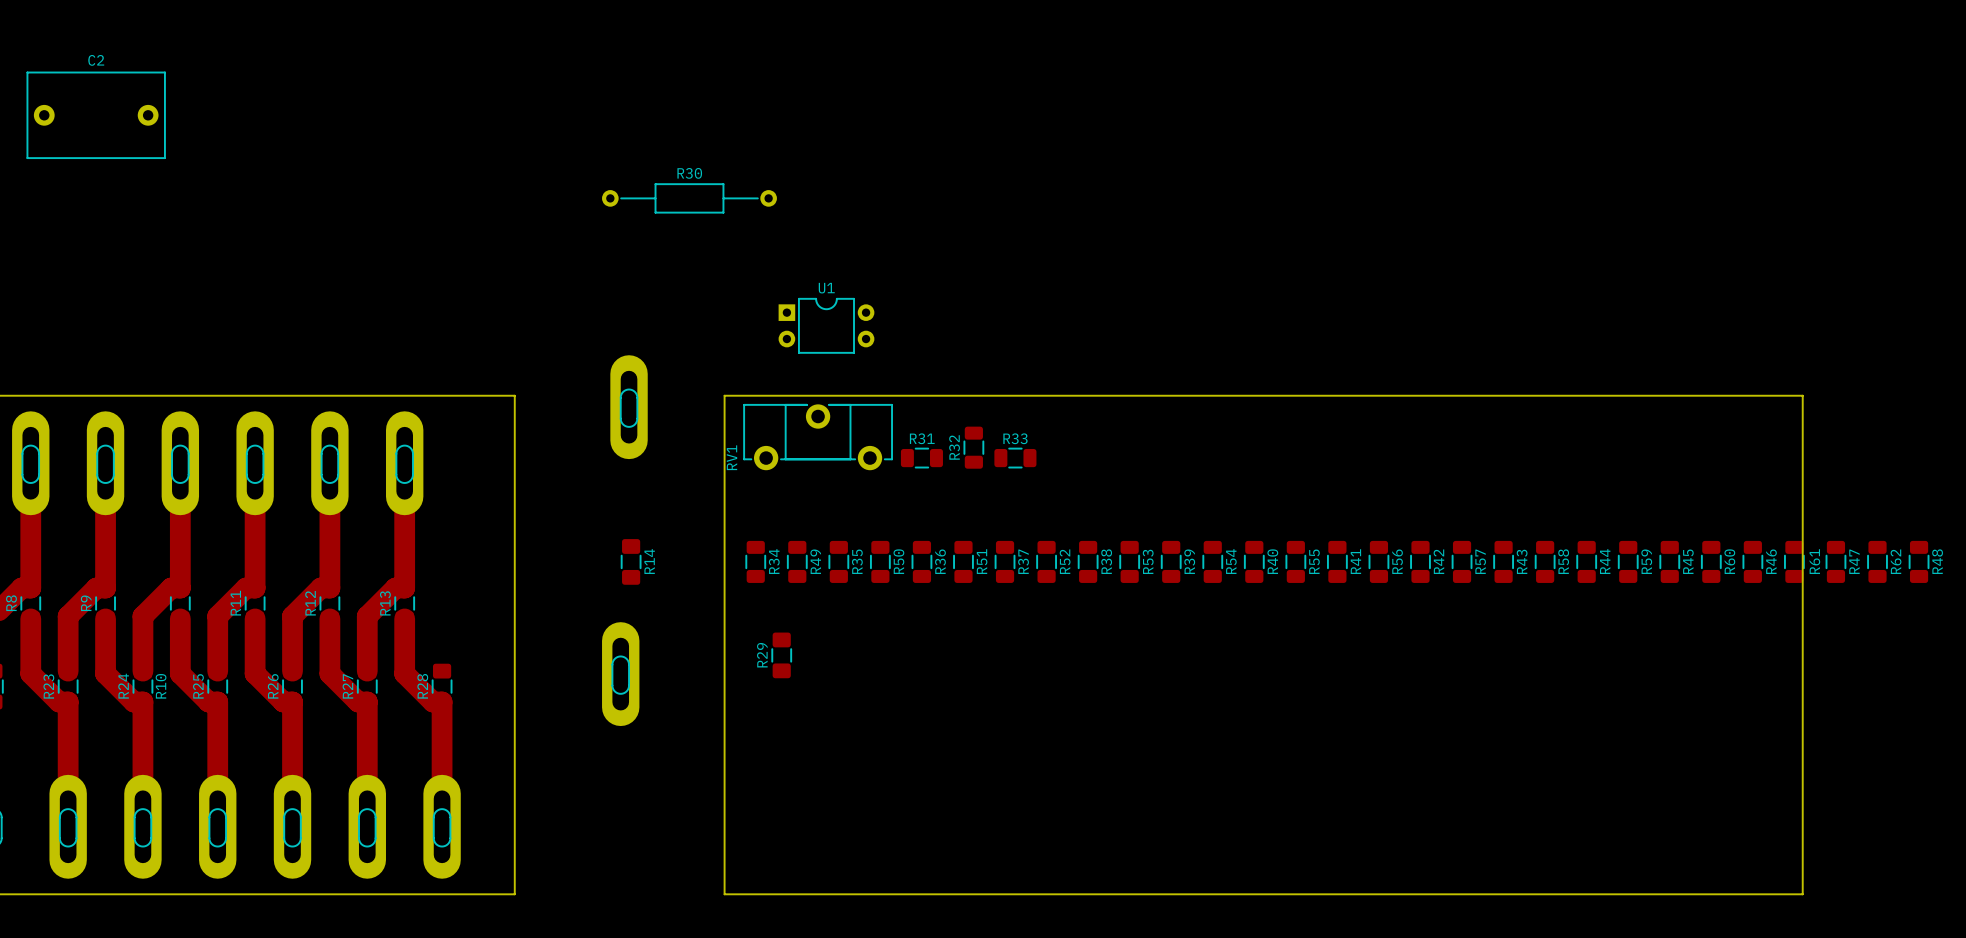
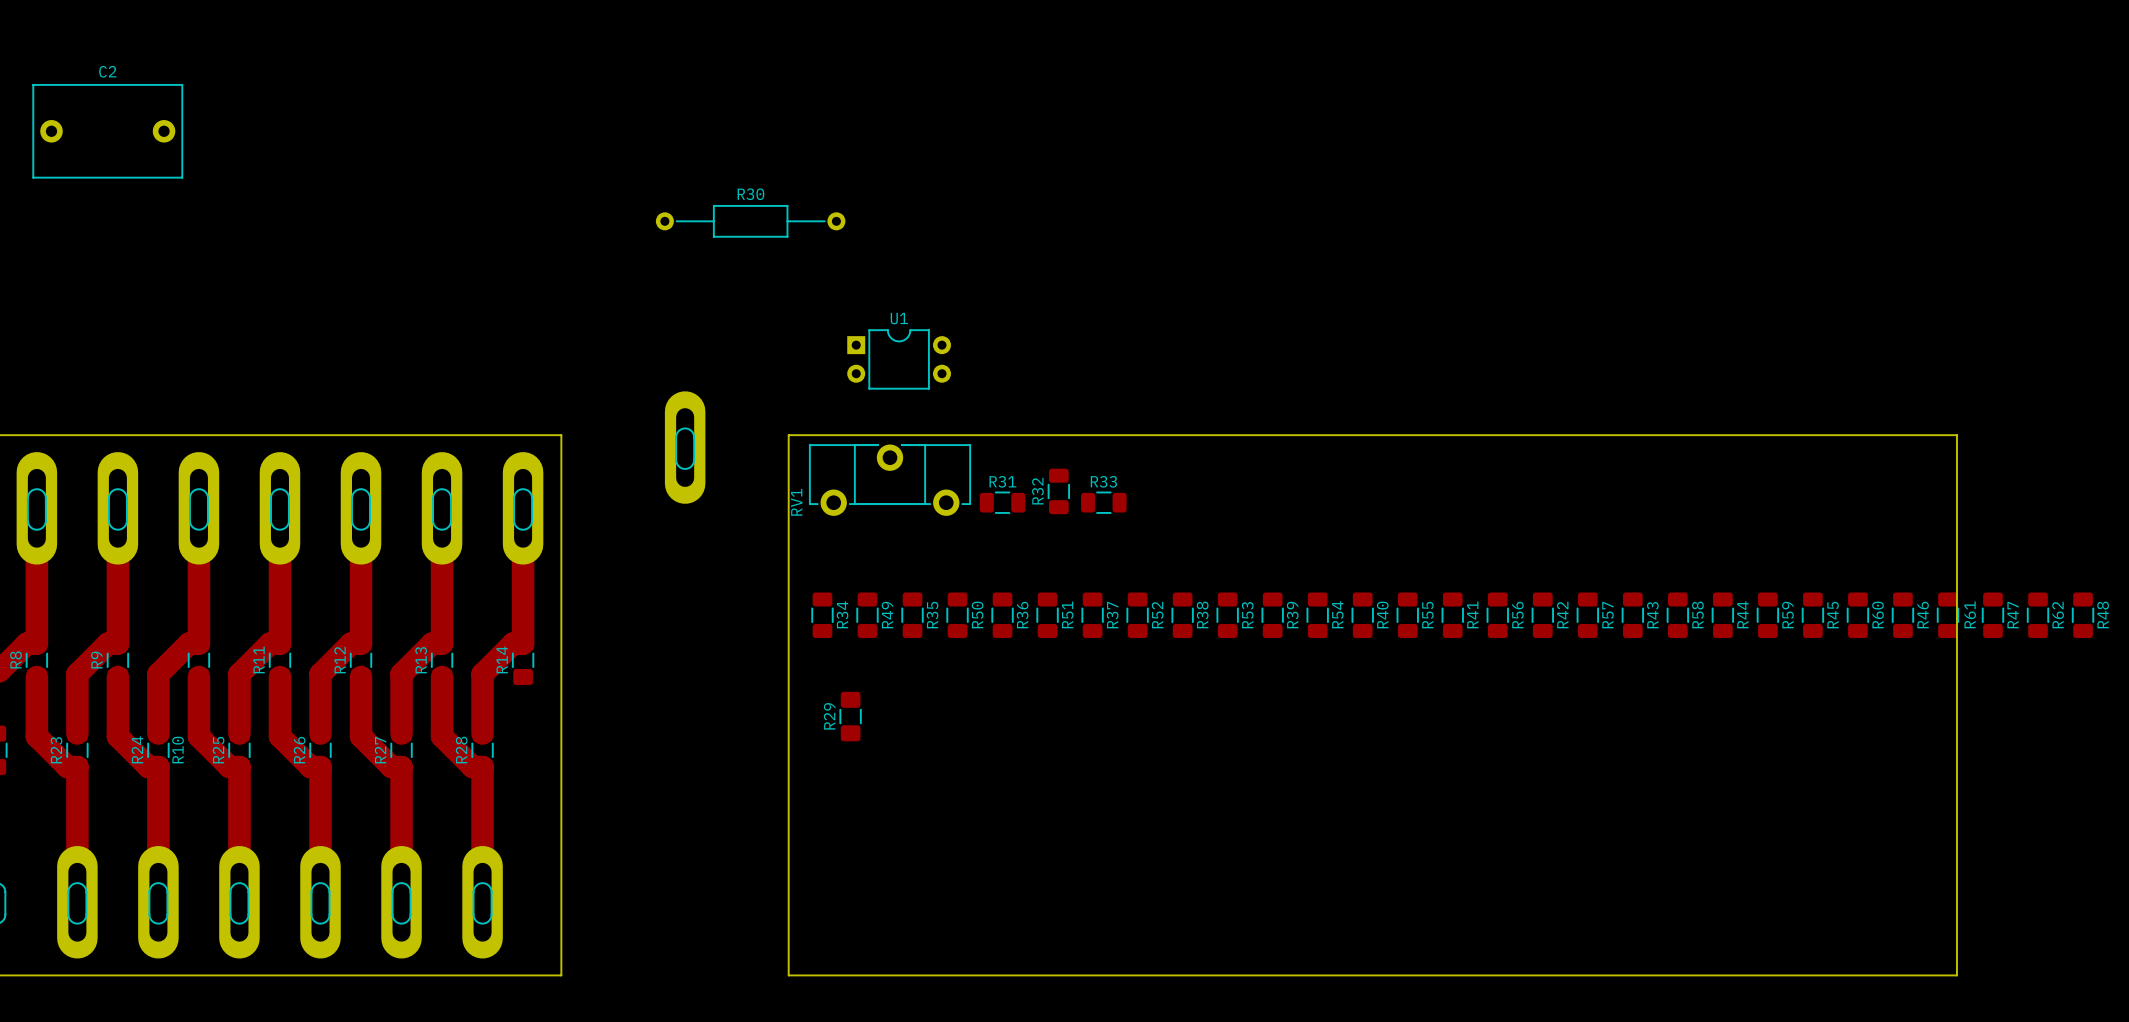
top track: none -> (523, 508) (523, 643) (513, 643) (482, 674) (482, 733)
R14 position: (631, 561) -> (523, 660)
R14 name position: R14 (649, 561) -> R14 (502, 659)
part position: (620, 674) -> (523, 508)

